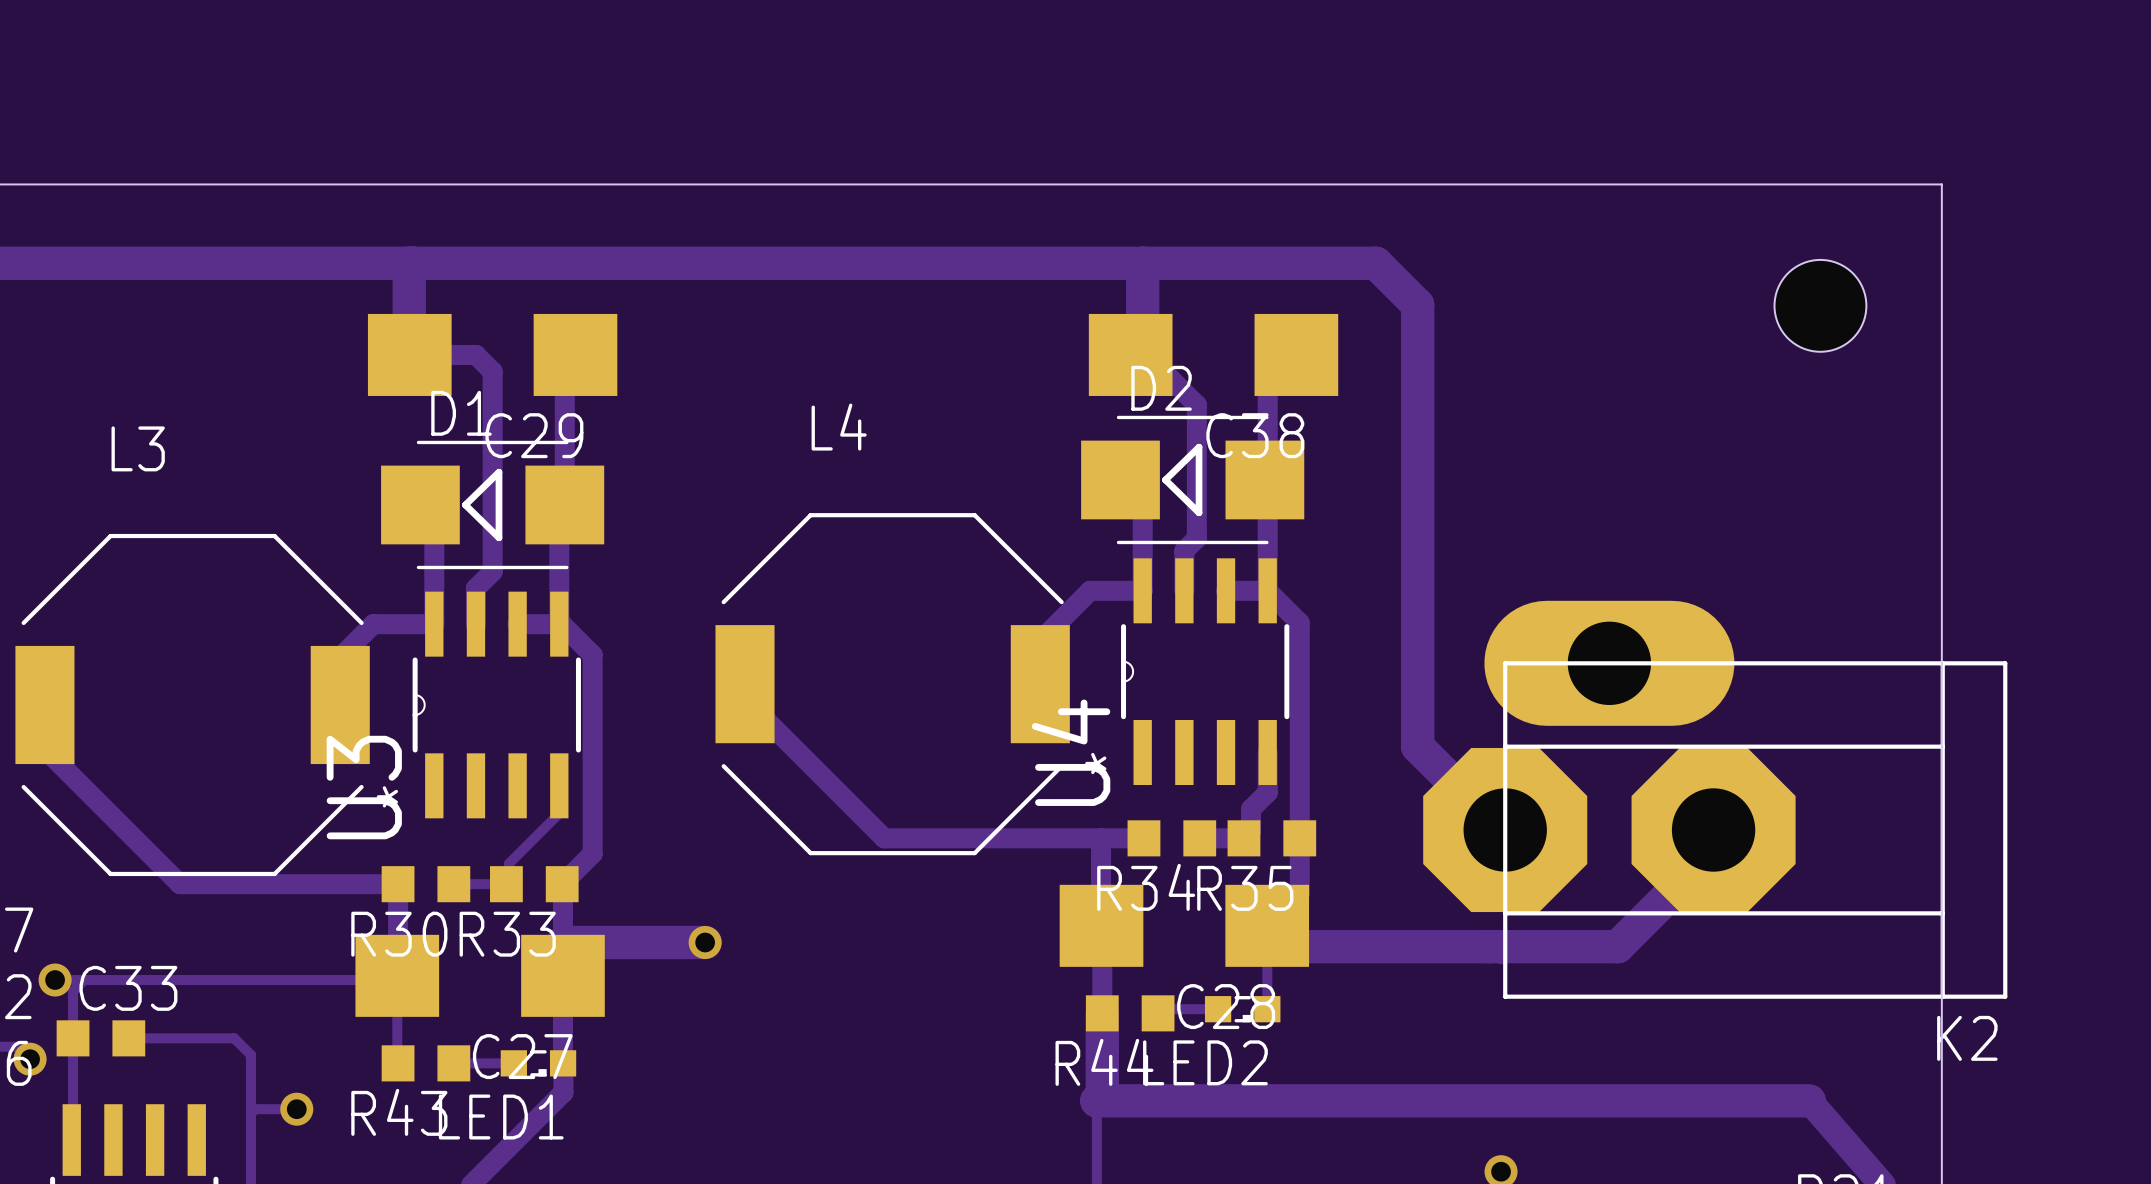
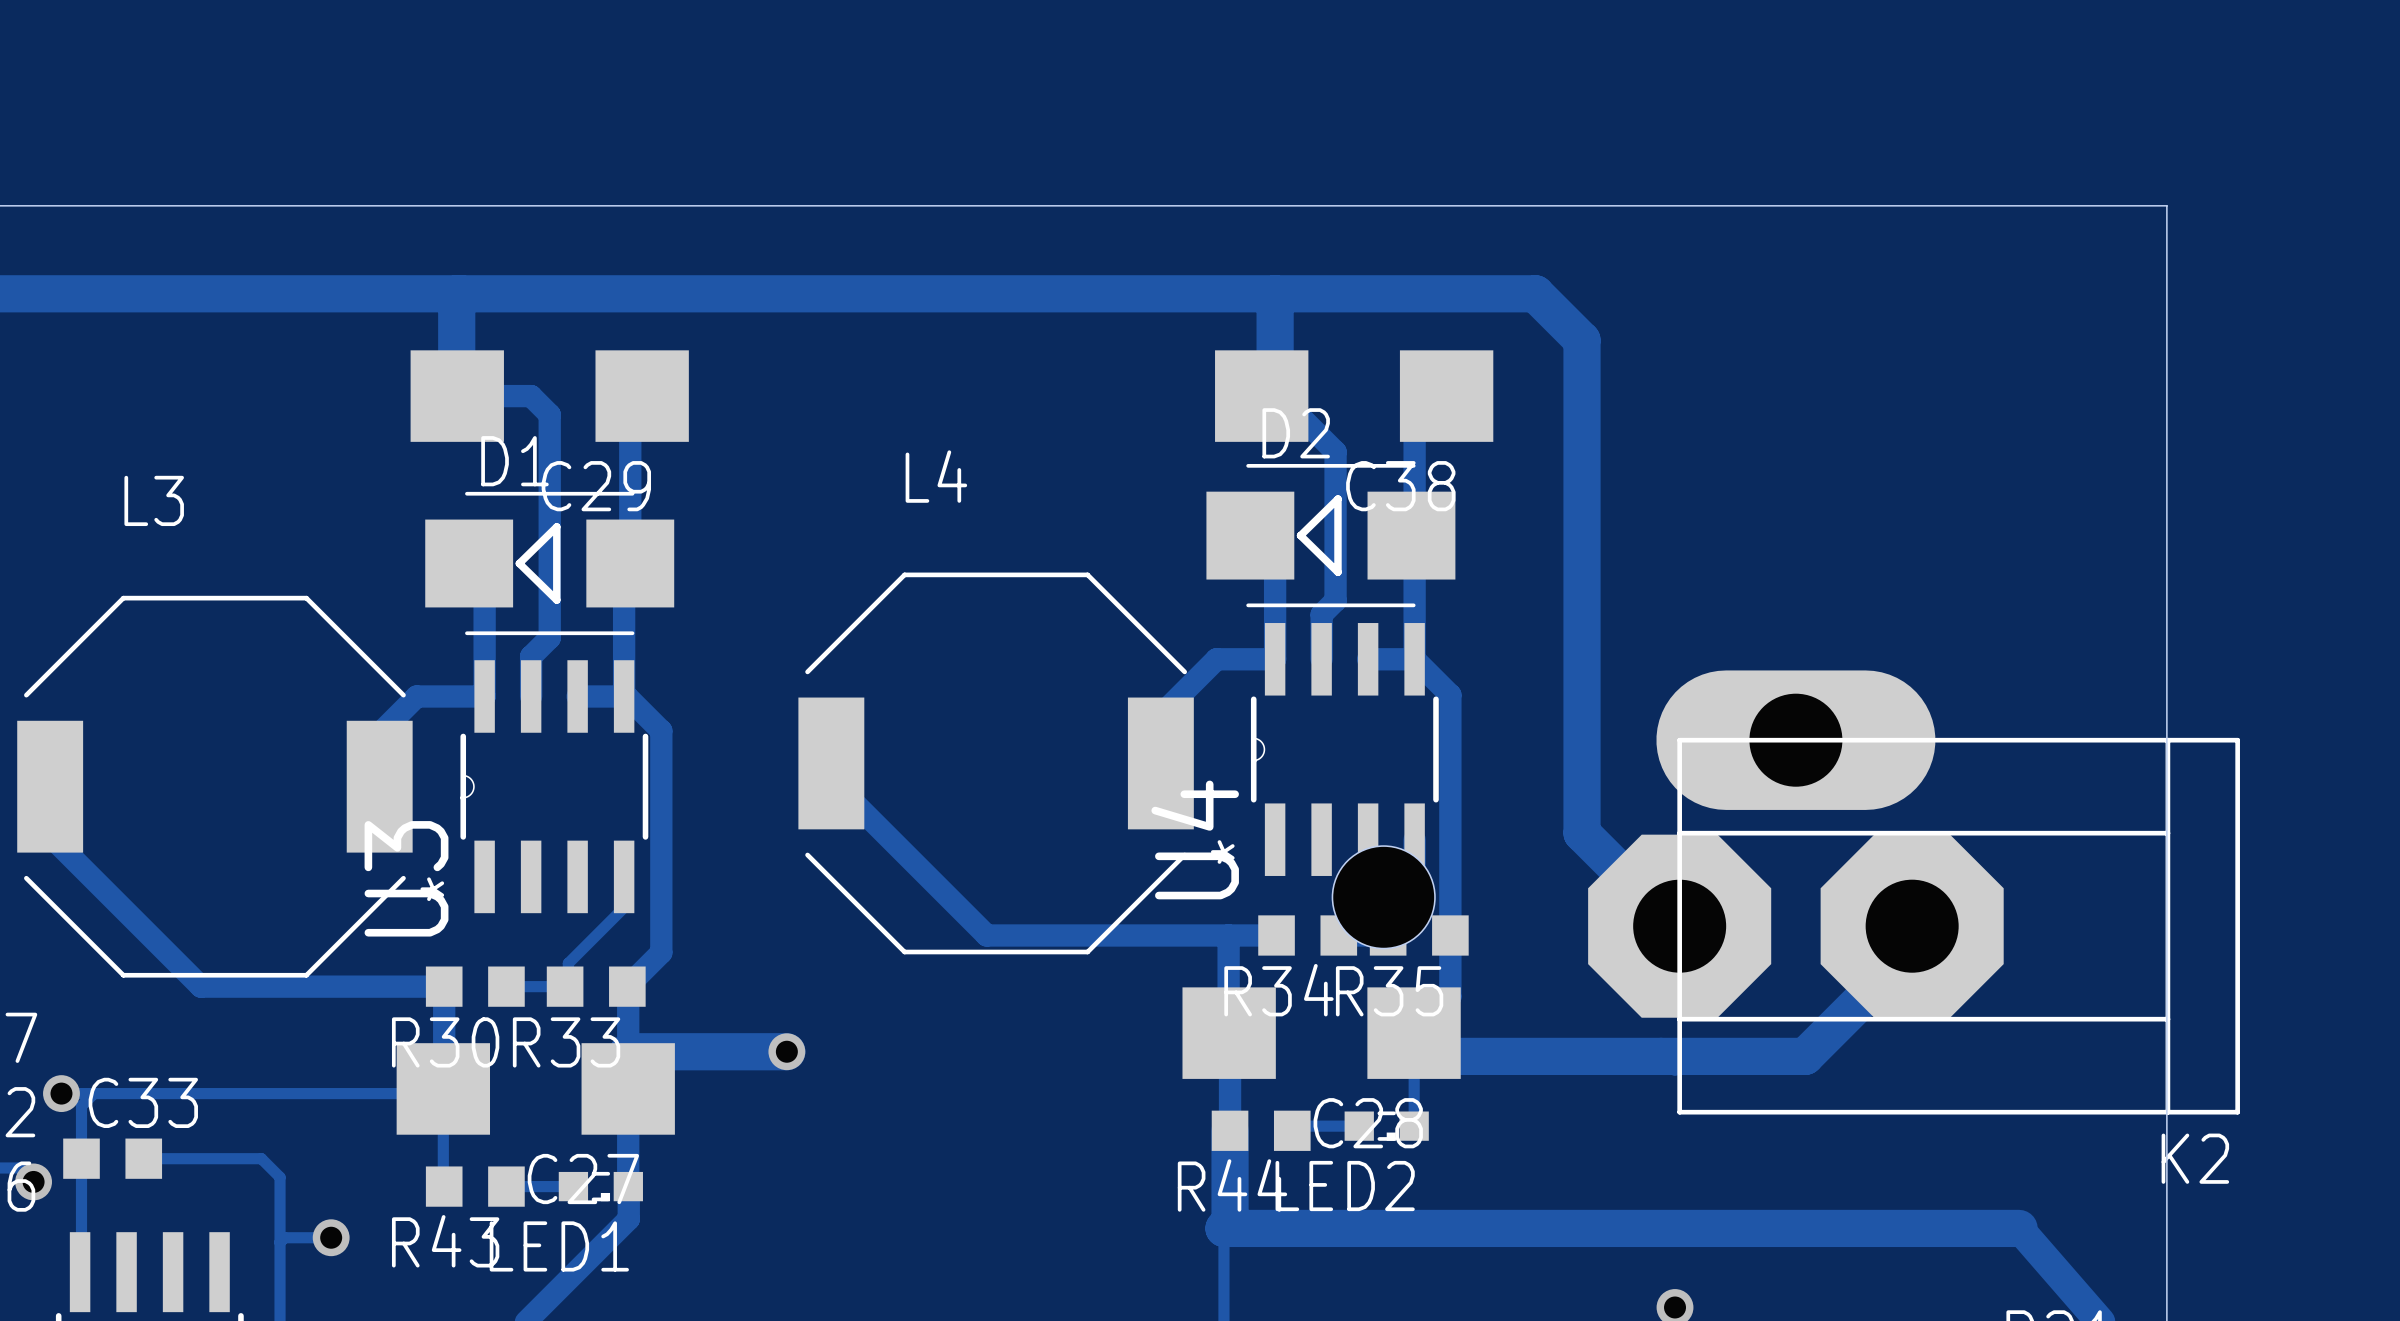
hole position: (1820, 305) -> (1383, 897)

